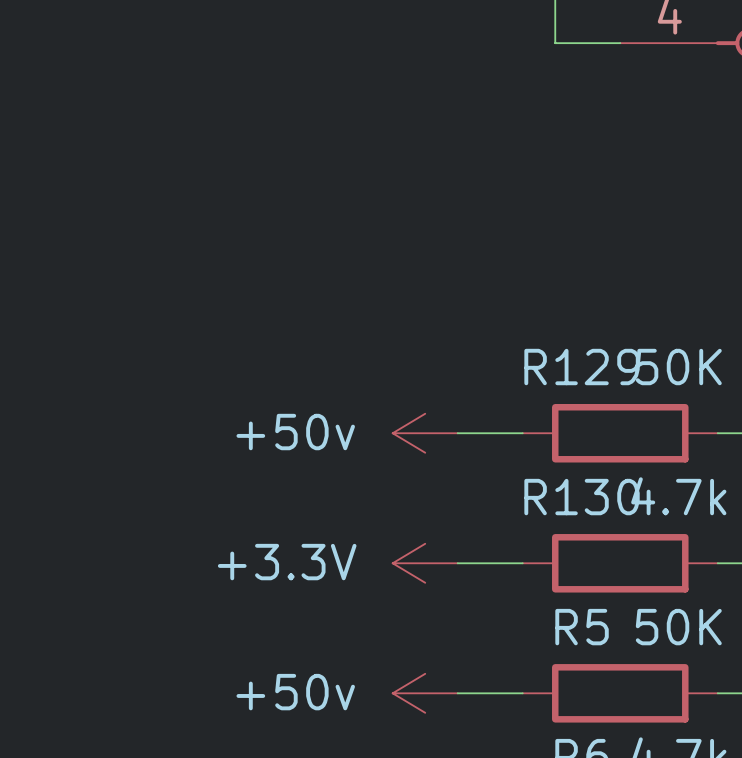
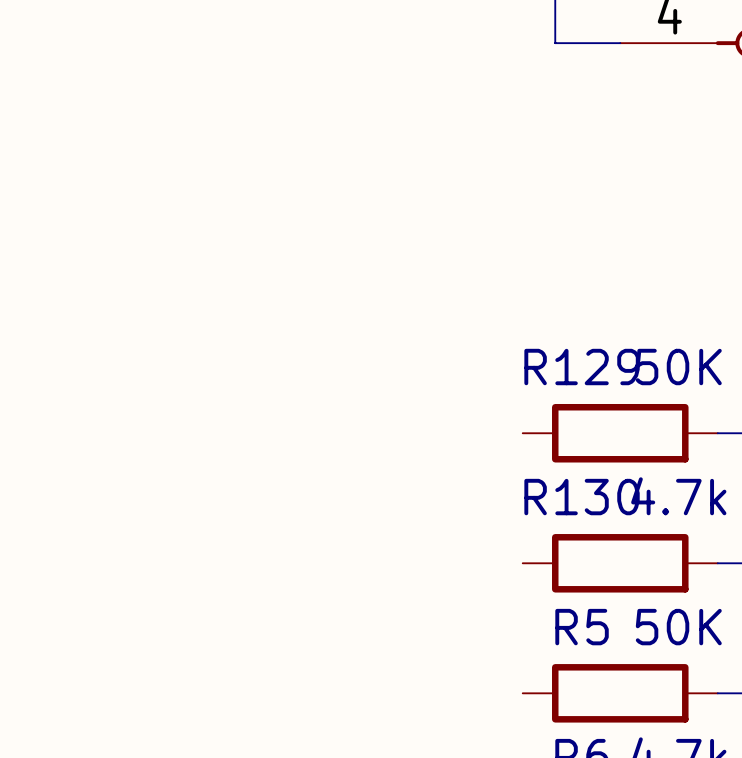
power symbol: +50v (425, 433) -> none
wire: (457, 433) (522, 433) -> none
power symbol: +3.3V (425, 563) -> none
wire: (457, 563) (522, 563) -> none
power symbol: +50v (425, 693) -> none
wire: (457, 693) (522, 693) -> none

